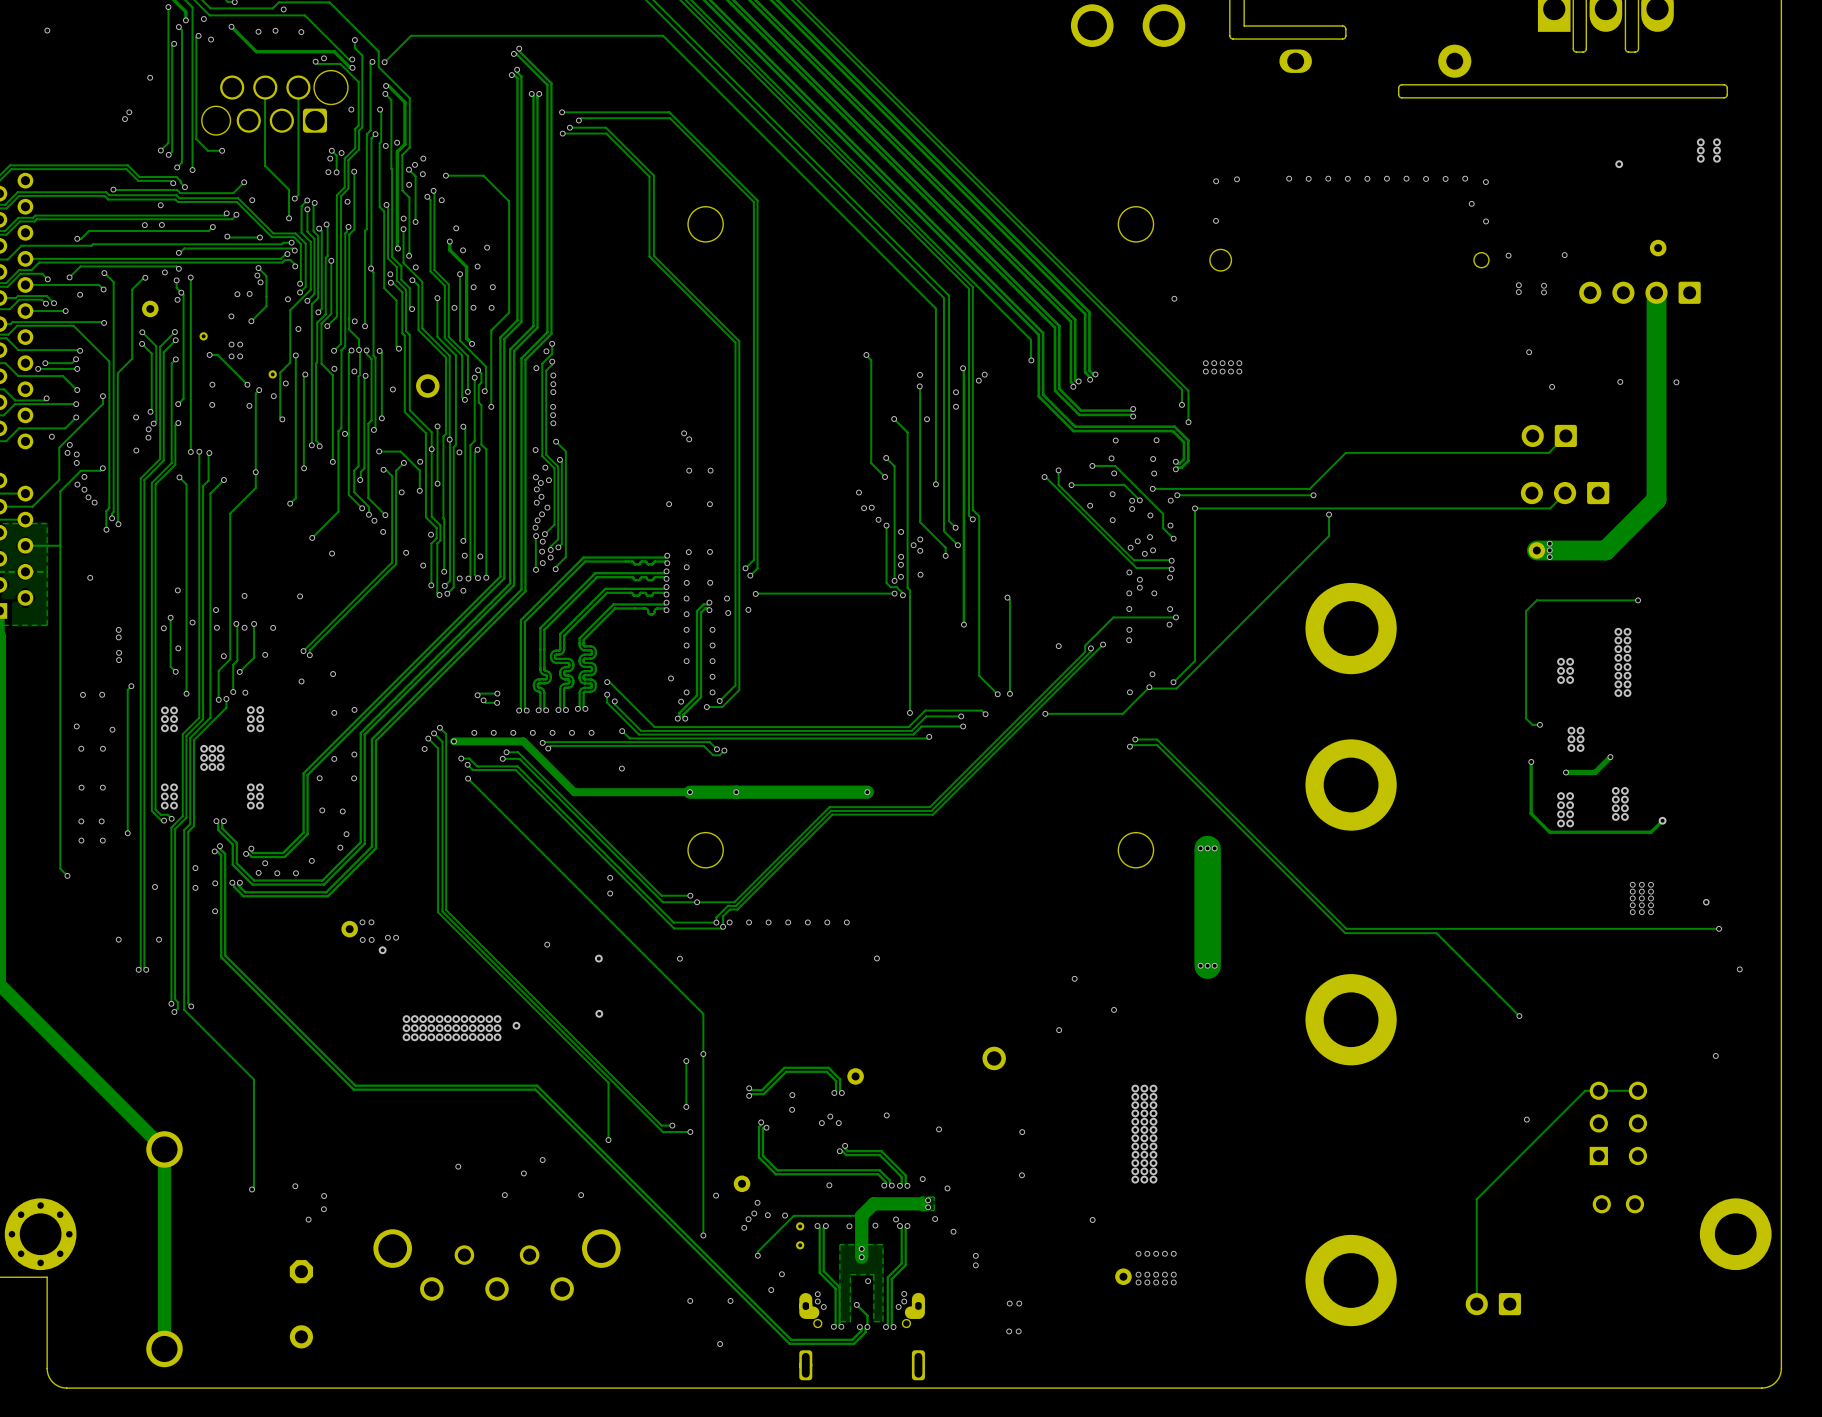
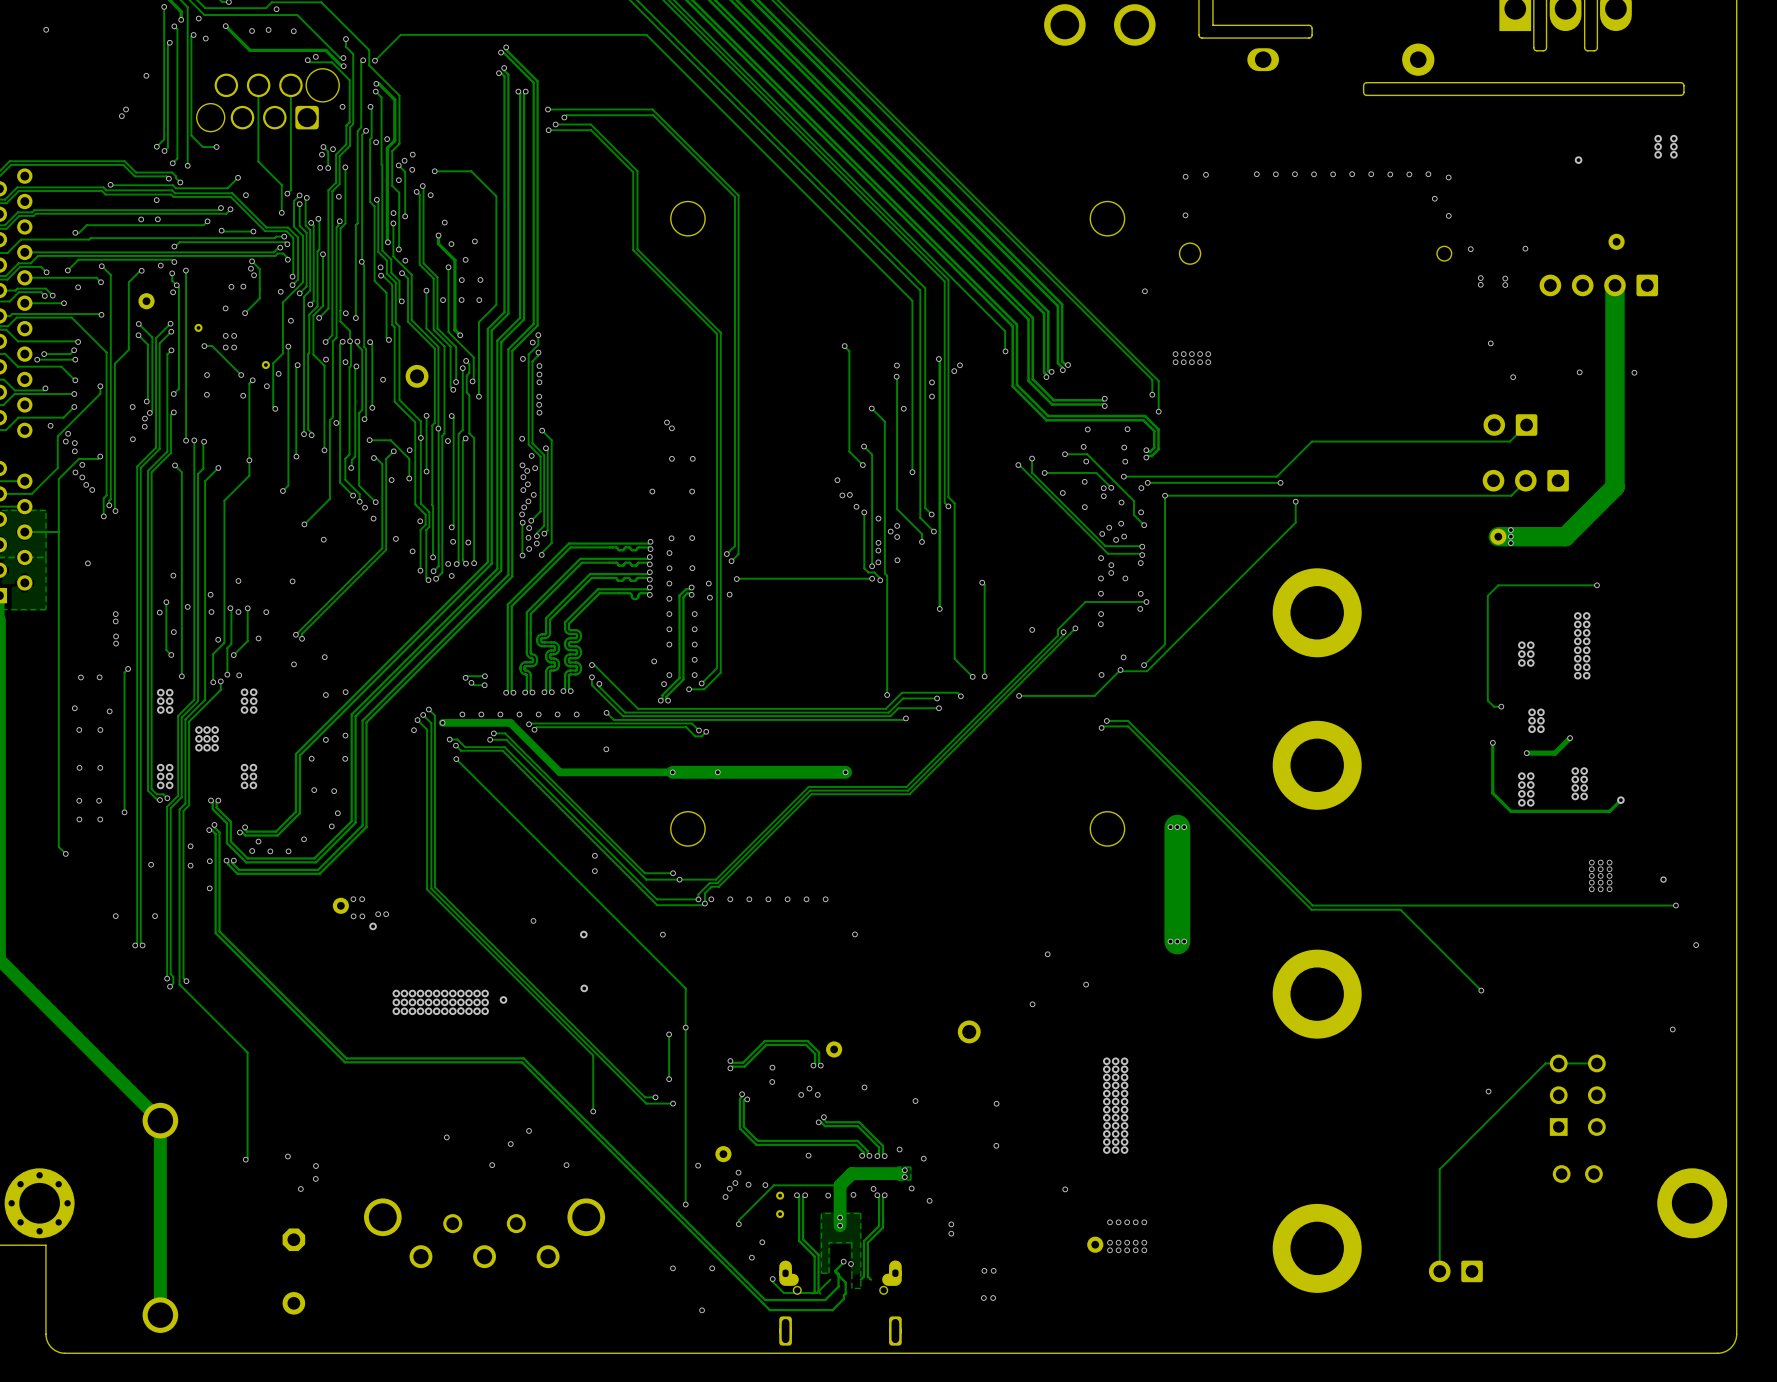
zone outline: (842, 1244) (839, 1244) (839, 1321) (850, 1321) (850, 1305) -> (821, 1213) (821, 1273) (829, 1273)
track: (901, 1257) (901, 1263) (887, 1277) (887, 1325) (885, 1327) -> (879, 1225) (863, 1241) (863, 1276) (860, 1279)
track: (905, 1259) (905, 1265) (891, 1279) (891, 1325) (893, 1327) -> (882, 1227) (867, 1242) (867, 1276) (871, 1279)
via: (868, 1281) -> none
via: (904, 1293) -> none
via: (817, 1294) -> none
via: none -> (843, 1261)
via: none -> (851, 1263)
via: (817, 1301) -> none
via: (904, 1301) -> none
via: (856, 1304) -> none
via: (823, 1306) -> none
via: (898, 1306) -> none
track: none -> (772, 1279) (772, 1281) (783, 1293) (816, 1293) (830, 1279)
via: none -> (772, 1279)
via: (833, 1326) -> none
via: (841, 1326) -> none
track: (859, 1327) (861, 1330) (852, 1339) (791, 1339) (784, 1333) -> (843, 1261) (835, 1270) (838, 1273) (838, 1286) (825, 1300) (765, 1300)
via: (859, 1327) -> none
via: (867, 1327) -> none
via: (885, 1327) -> none
via: (893, 1327) -> none

